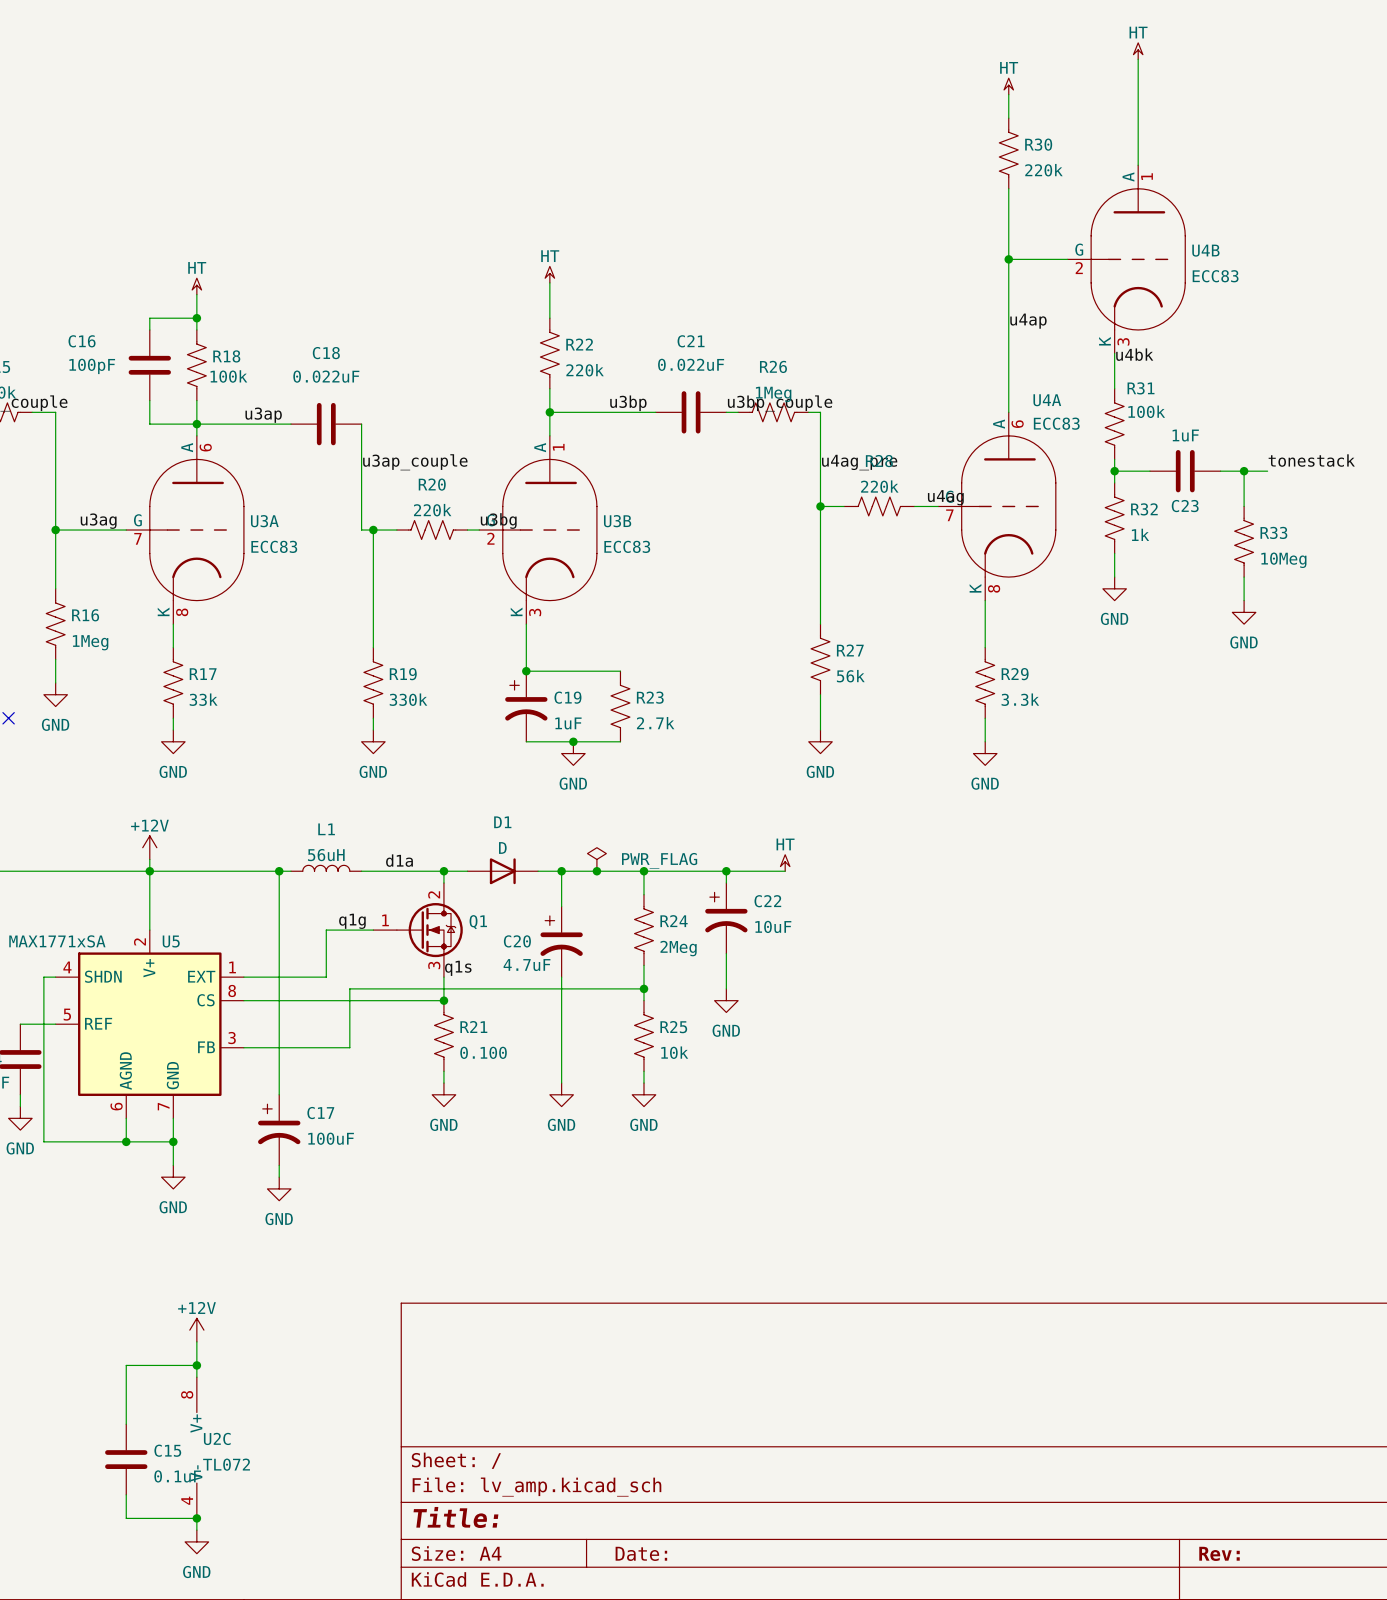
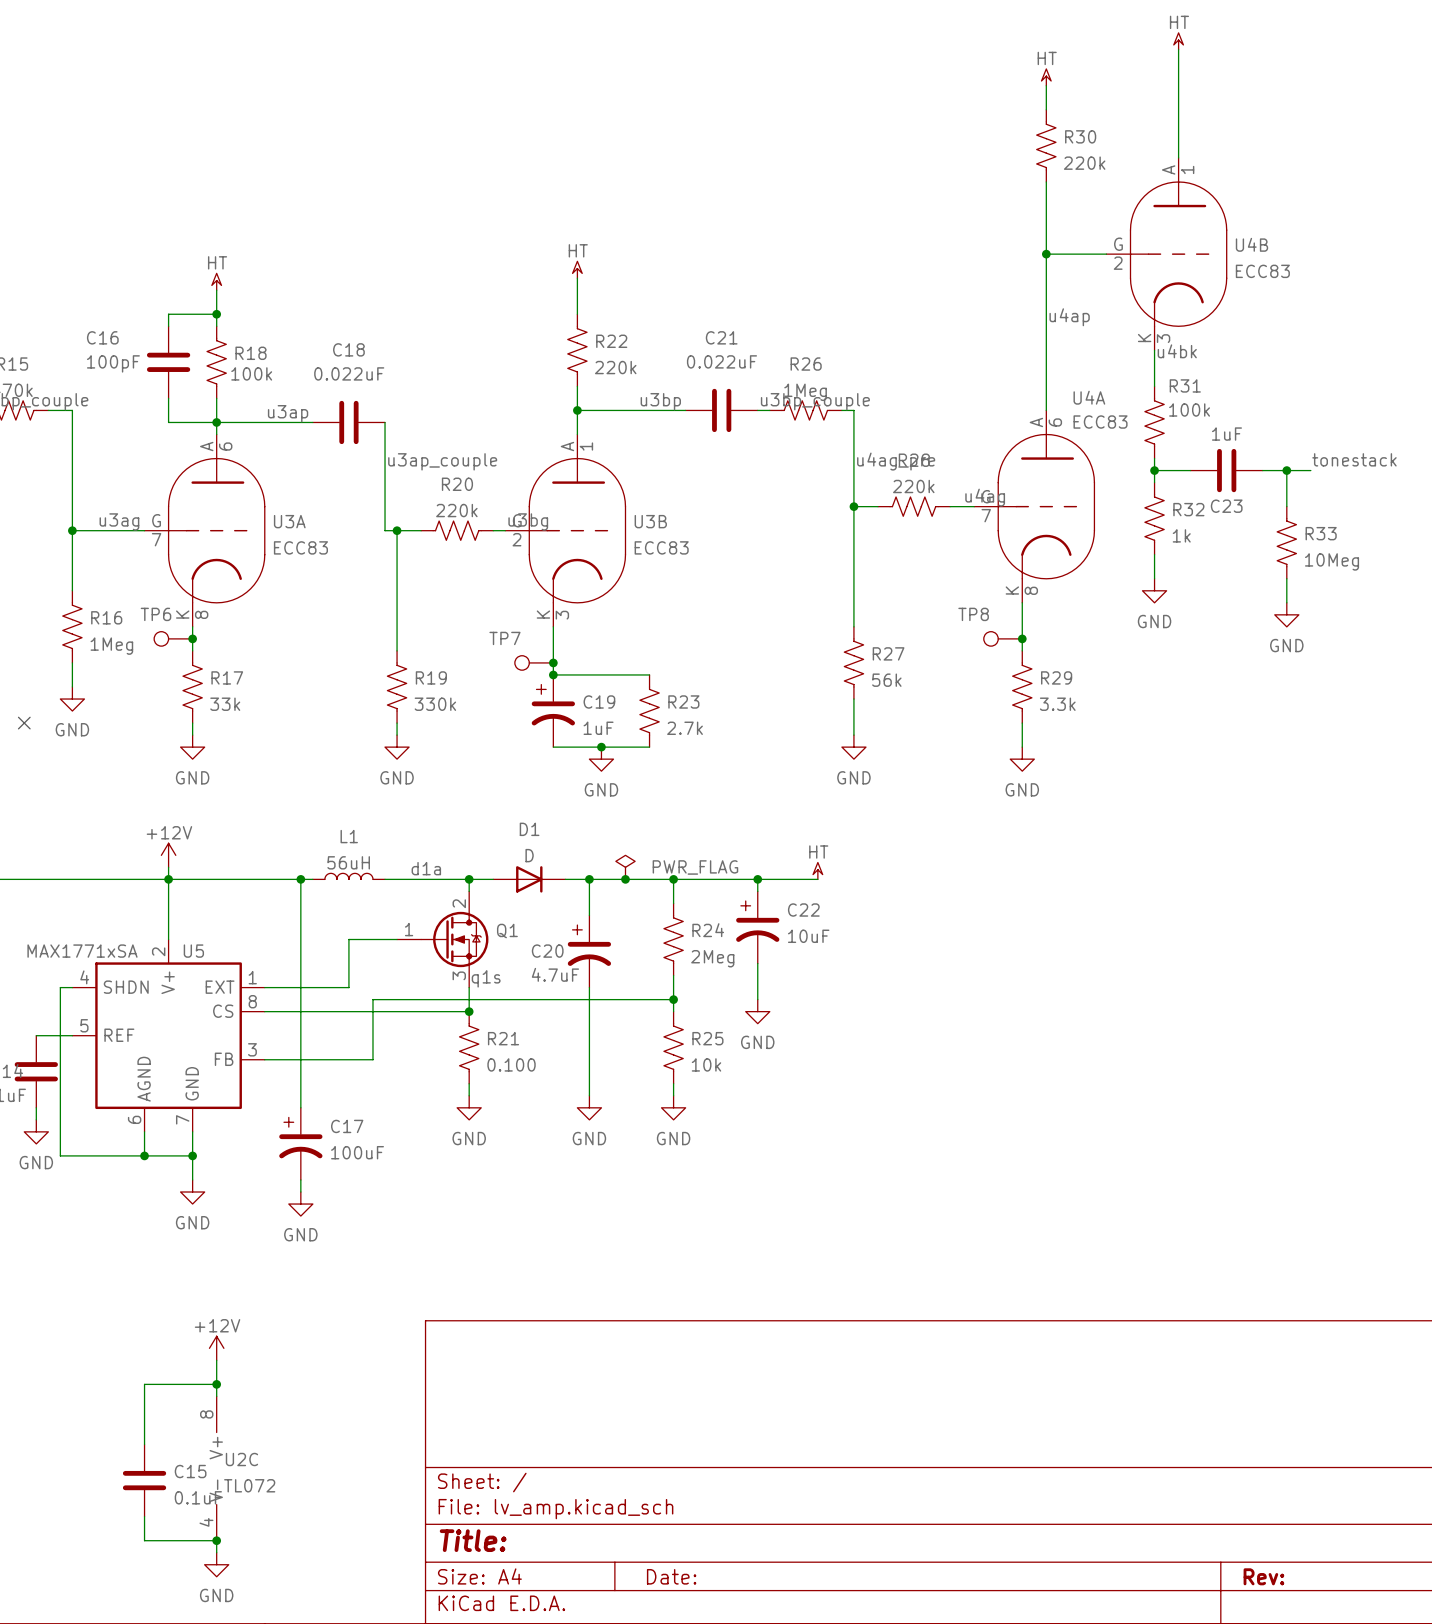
TP6: none -> (173, 638)
junction: none -> (192, 638)
TP8: none -> (1003, 638)
junction: none -> (1022, 638)
TP7: none -> (534, 662)
junction: none -> (553, 662)
label: q1g (352, 921) -> none

